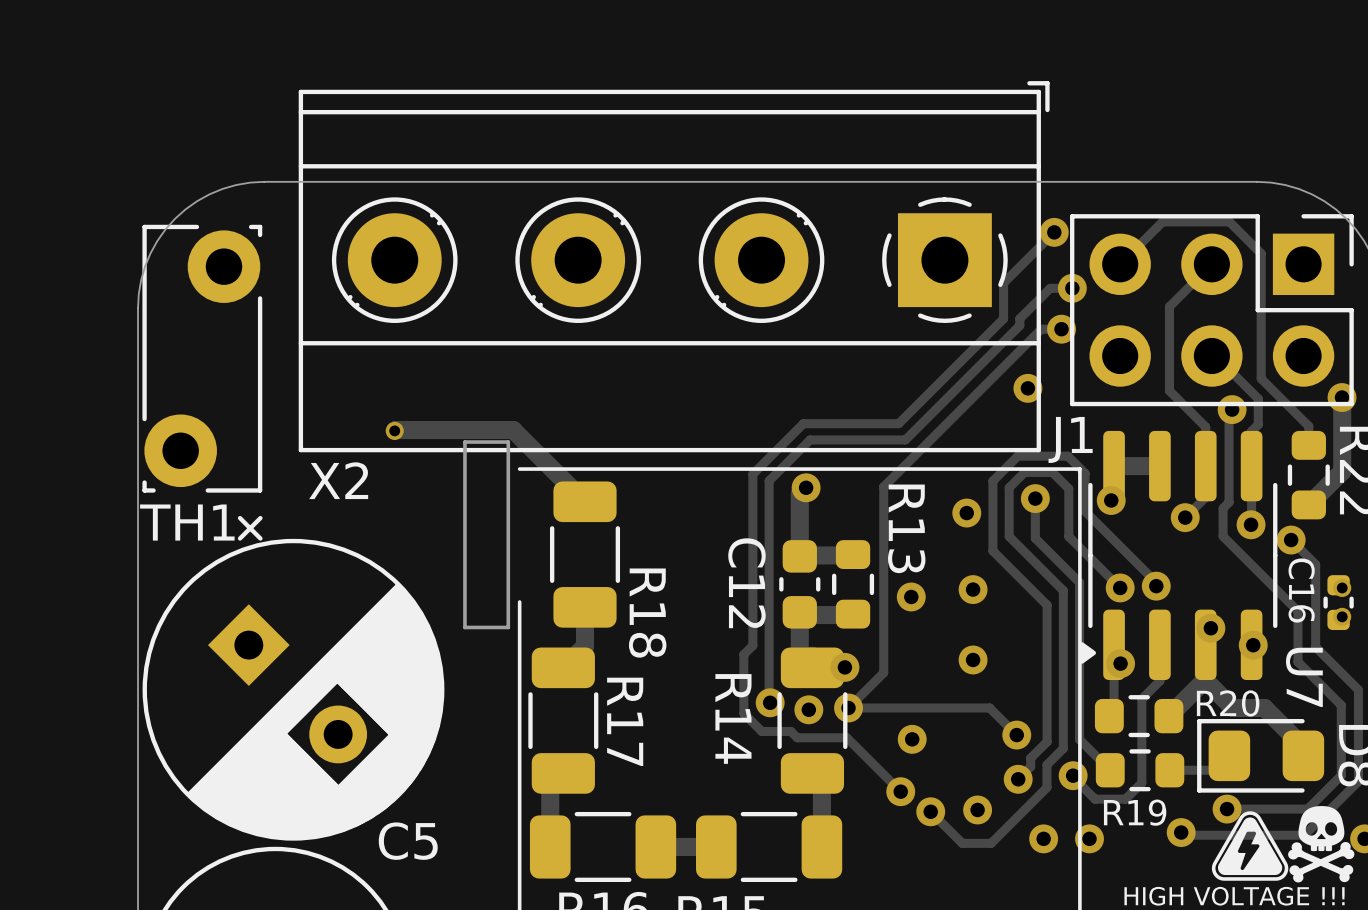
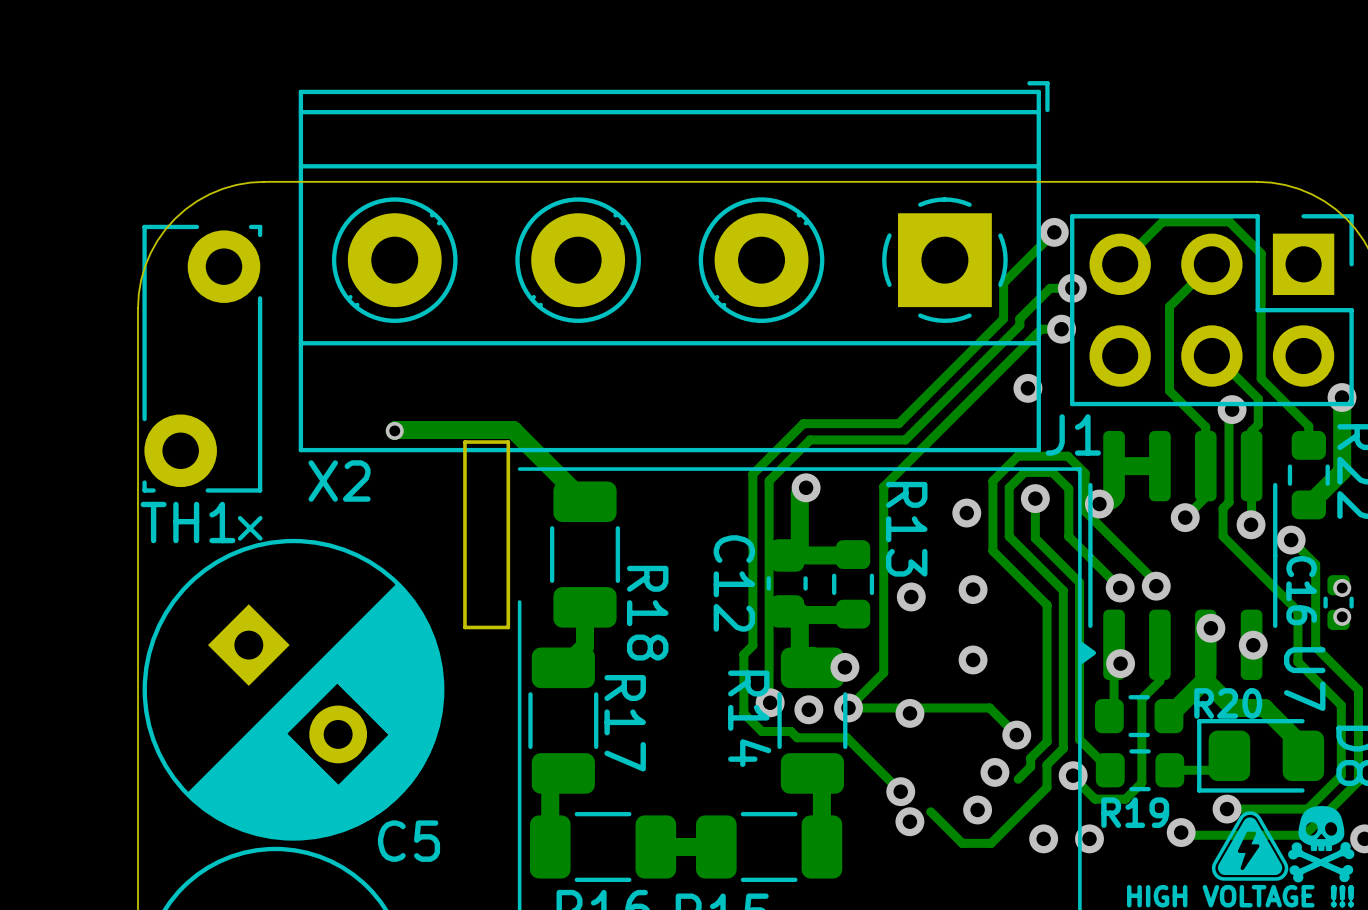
via position: (1111, 500) -> (1099, 504)
C12 position: (799, 584) -> (787, 583)
R14 name position: R14 (733, 718) -> R14 (749, 718)
via position: (912, 739) -> (909, 713)
via position: (1018, 779) -> (994, 772)
via position: (930, 811) -> (909, 821)

